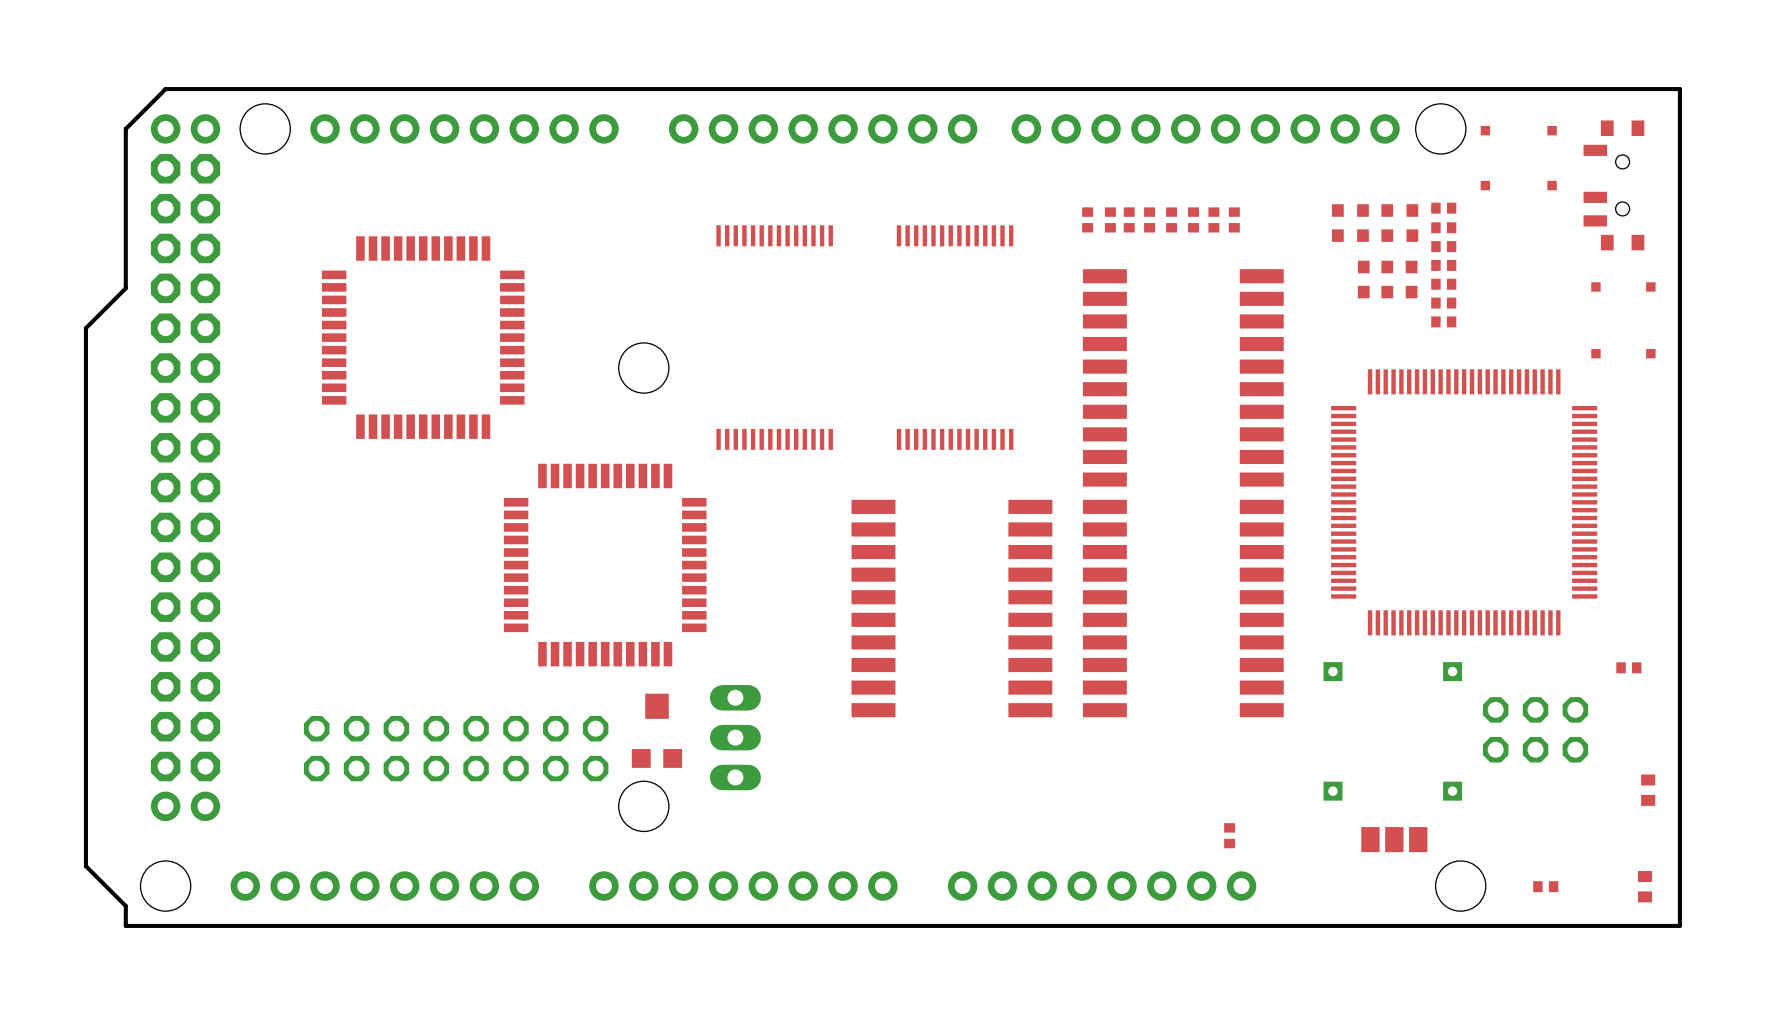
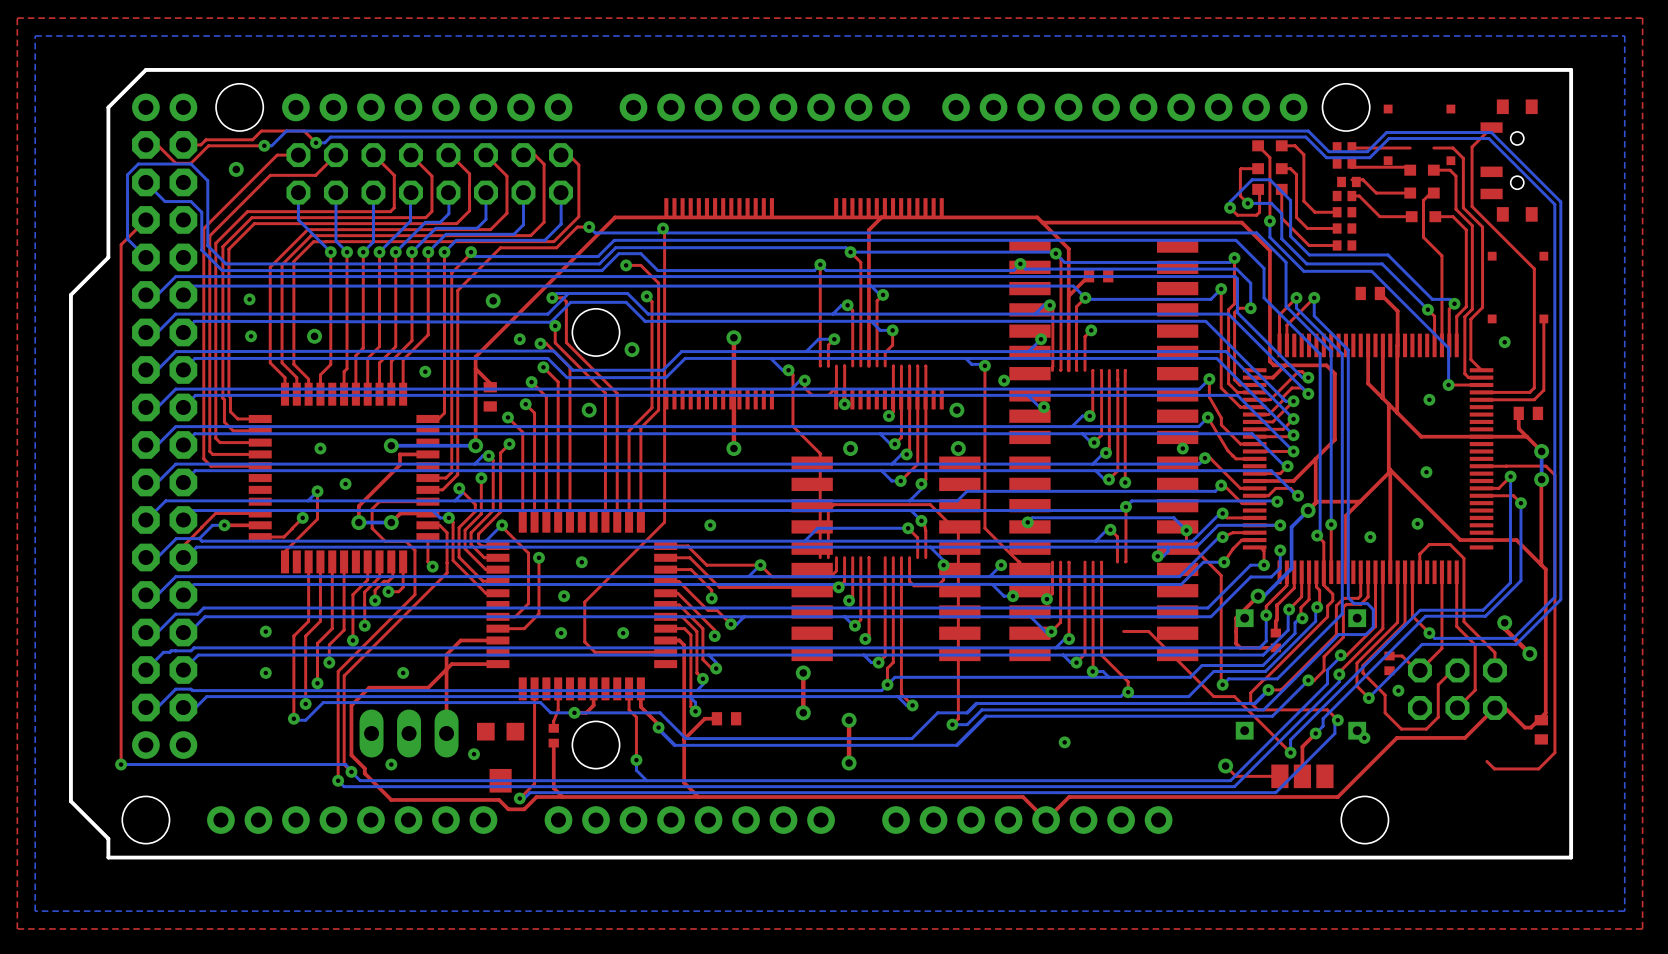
top zone outline: none -> (1642, 18) (1642, 928) (17, 928) (17, 18) (1642, 18)
bottom zone outline: none -> (1624, 35) (1624, 911) (35, 911) (35, 35) (1624, 35)
top track: none -> (1491, 127) (1472, 147) (1472, 206) (1534, 268) (1534, 387) (1529, 392) (1481, 392)
top track: none -> (316, 142) (304, 131) (261, 131) (252, 139) (206, 139) (200, 144) (183, 144)
bottom track: none -> (316, 142) (324, 142) (330, 137) (1305, 137) (1326, 157) (1369, 157) (1389, 138) (1488, 138) (1554, 204) (1554, 597) (1513, 638) (1434, 638) (1429, 633)
via: none -> (316, 142)
top track: none -> (145, 144) (157, 144) (175, 163) (191, 163) (208, 145) (264, 145)
bottom track: none -> (264, 145) (271, 145) (286, 131) (1308, 131) (1328, 151) (1367, 151) (1386, 132) (1491, 132) (1560, 201) (1560, 599) (1516, 644) (1422, 644) (1368, 698)
via: none -> (264, 145)
top track: none -> (1258, 145) (1269, 157) (1269, 221)
part: none -> (1269, 145)
top track: none -> (1281, 145) (1295, 145) (1303, 154) (1303, 201) (1314, 212) (1337, 212)
part: none -> (1344, 147)
top track: none -> (1351, 147) (1410, 148)
top track: none -> (1433, 148) (1453, 148) (1463, 158) (1463, 207) (1482, 227) (1482, 307) (1470, 319) (1470, 359) (1481, 370)
top track: none -> (298, 155) (277, 155) (203, 228) (203, 458) (211, 466) (260, 466)
top track: none -> (335, 155) (315, 175) (270, 175) (209, 235) (209, 451) (212, 454) (260, 454)
top track: none -> (373, 155) (394, 175) (394, 207) (390, 211) (247, 211) (215, 243) (215, 438) (220, 442) (260, 442)
top track: none -> (410, 155) (431, 176) (431, 211) (425, 217) (251, 217) (222, 246) (224, 422) (233, 430) (260, 430)
top track: none -> (448, 155) (450, 155) (469, 173) (469, 185)
top track: none -> (485, 155) (506, 176) (506, 213) (490, 229) (307, 229) (270, 267) (270, 362) (285, 377) (285, 394)
top track: none -> (523, 155) (535, 155) (544, 164) (544, 222) (530, 235) (311, 235) (282, 264) (282, 362) (296, 377) (296, 394)
top track: none -> (560, 155) (568, 155) (578, 165) (578, 216) (553, 241) (326, 241)
part: none -> (1344, 163)
top track: none -> (1351, 163) (1351, 167) (1407, 167) (1410, 170)
via: none -> (236, 169)
top track: none -> (1258, 168) (1240, 169) (1240, 196) (1247, 203)
part: none -> (1269, 168)
top track: none -> (1281, 168) (1290, 168) (1296, 174) (1296, 217) (1307, 228) (1337, 228)
part: none -> (1422, 170)
top track: none -> (1433, 170) (1450, 170) (1455, 176) (1455, 209) (1472, 225) (1472, 309) (1464, 316) (1464, 373) (1468, 377) (1481, 377)
part: none -> (429, 173)
top track: none -> (1351, 179) (1362, 179) (1376, 193) (1410, 193)
bottom track: none -> (145, 182) (165, 201) (191, 201) (201, 212) (201, 250) (222, 270) (601, 270) (618, 253) (640, 253) (657, 270) (814, 270) (820, 264) (826, 270) (1013, 270) (1020, 263) (1025, 269) (1236, 269) (1250, 283) (1250, 308)
top track: none -> (469, 185) (469, 199)
top track: none -> (1258, 189) (1259, 212) (1256, 215) (1237, 215) (1230, 207)
top track: none -> (1281, 189) (1281, 218) (1309, 245) (1337, 245)
bottom track: none -> (298, 192) (298, 219) (330, 252)
bottom track: none -> (335, 192) (335, 241) (347, 252)
bottom track: none -> (373, 192) (373, 241) (363, 252)
bottom track: none -> (410, 192) (410, 221) (379, 252)
bottom track: none -> (448, 192) (448, 213) (440, 222) (425, 222) (395, 252)
bottom track: none -> (485, 192) (485, 219) (477, 228) (435, 228) (412, 252)
bottom track: none -> (523, 192) (523, 224) (513, 234) (446, 234) (428, 252)
bottom track: none -> (561, 192) (561, 224) (544, 240) (456, 240) (444, 252)
part: (1087, 219) -> none
part: (1110, 219) -> none
part: (1129, 219) -> none
part: (1149, 219) -> none
part: (1171, 219) -> none
part: (1193, 219) -> none
part: (1213, 219) -> none
part: (1234, 219) -> none
part: none -> (1422, 193)
top track: none -> (1433, 193) (1430, 193) (1423, 200) (1423, 237) (1441, 255) (1441, 345)
part: (1337, 223) -> none
part rotation: 0° (1362, 223) -> 90° clockwise (1269, 189)
part: (1387, 223) -> none
part: (1412, 223) -> none
part: none -> (1344, 196)
top track: none -> (1351, 196) (1359, 196) (1379, 216) (1411, 216)
top track: none -> (469, 199) (469, 210) (456, 223) (254, 223) (228, 249) (230, 411) (237, 418) (260, 418)
part: (1443, 227) -> none
bottom track: none -> (1247, 203) (1271, 203) (1281, 213) (1281, 238) (1306, 263) (1382, 263) (1427, 309)
via: none -> (1247, 203)
bottom track: none -> (1230, 207) (1230, 201) (1252, 179) (1269, 179) (1290, 200) (1290, 236) (1309, 254) (1387, 254) (1432, 299) (1450, 299) (1454, 303)
via: none -> (1230, 207)
part: none -> (1344, 212)
top track: none -> (881, 217) (868, 230) (868, 365)
part: none -> (1423, 216)
top track: none -> (1435, 216) (1453, 216) (1466, 229) (1466, 306) (1456, 316) (1456, 345)
part: (1443, 246) -> none
top track: none -> (145, 219) (121, 244) (121, 764)
bottom track: none -> (1269, 221) (1269, 237) (1303, 271) (1371, 271) (1448, 348) (1448, 385)
via: none -> (1269, 221)
top track: none -> (1042, 222) (1241, 222) (1269, 250) (1269, 361) (1273, 365) (1326, 365) (1334, 373) (1334, 439) (1293, 481) (1254, 481)
top track: none -> (589, 227) (577, 227) (556, 247) (500, 247) (457, 290) (457, 474) (442, 489) (427, 489)
bottom track: none -> (589, 227) (595, 232) (658, 232) (663, 228) (667, 232) (1256, 232) (1286, 262) (1286, 306) (1331, 351) (1331, 524)
via: none -> (589, 227)
top track: none -> (663, 228) (664, 230) (664, 522) (584, 602) (584, 641) (595, 652) (665, 652)
via: none -> (663, 228)
part: none -> (1344, 228)
part: (1443, 265) -> none
top track: none -> (326, 241) (313, 241) (293, 261) (293, 364) (308, 379) (308, 394)
part: none -> (1344, 245)
part: (1363, 279) -> none
part: (1387, 279) -> none
part: (1411, 279) -> none
top track: none -> (330, 252) (330, 364) (320, 374) (320, 394)
via: none -> (330, 252)
top track: none -> (347, 252) (347, 368) (344, 371) (344, 394)
via: none -> (347, 252)
top track: none -> (363, 252) (363, 348) (355, 355) (355, 394)
via: none -> (363, 252)
top track: none -> (379, 252) (379, 346) (367, 358) (367, 394)
via: none -> (379, 252)
top track: none -> (395, 252) (395, 346) (379, 362) (379, 394)
via: none -> (395, 252)
top track: none -> (412, 252) (412, 340) (391, 361) (391, 394)
via: none -> (412, 252)
top track: none -> (428, 252) (428, 334) (403, 359) (403, 394)
via: none -> (428, 252)
top track: none -> (444, 252) (444, 413) (438, 418) (427, 418)
via: none -> (444, 252)
top track: none -> (471, 252) (451, 272)
bottom track: none -> (471, 252) (475, 256) (598, 256) (614, 240) (1235, 240) (1264, 268) (1264, 297) (1320, 354) (1320, 532) (1317, 535)
via: none -> (471, 252)
top track: none -> (850, 252) (860, 262) (860, 365)
via: none -> (850, 252)
top track: none -> (1055, 253) (1060, 258) (1060, 370)
via: none -> (1055, 253)
part: (1443, 284) -> none
bottom track: none -> (145, 257) (127, 239) (127, 174) (138, 164) (191, 164) (207, 180) (207, 245) (225, 263) (599, 263) (615, 247) (846, 247) (850, 252) (1054, 252) (1064, 262) (1230, 262) (1234, 258)
top track: none -> (1234, 258) (1234, 303) (1228, 309) (1228, 383) (1237, 392) (1254, 392)
via: none -> (1234, 258)
via: none -> (1020, 263)
top track: none -> (626, 265) (640, 265) (658, 283) (658, 410) (640, 427) (640, 521)
via: none -> (626, 265)
top track: none -> (820, 264) (820, 365)
via: none -> (820, 264)
part: (1443, 303) -> none
top track: none -> (451, 272) (451, 472) (445, 478) (427, 478)
top track: none -> (1089, 275) (1068, 296)
part: none -> (1098, 275)
bottom track: none -> (871, 286) (880, 294) (883, 294)
top track: none -> (1221, 289) (1221, 387) (1240, 407) (1254, 407)
bottom track: none -> (1221, 289) (1210, 299) (1086, 299) (1073, 286) (192, 286) (183, 294)
via: none -> (1221, 289)
part: (1443, 321) -> none
bottom track: none -> (568, 293) (547, 314) (175, 314) (157, 332) (145, 332)
part: none -> (1370, 293)
top track: none -> (1379, 293) (1397, 311) (1397, 412)
bottom track: none -> (145, 294) (157, 294) (175, 276) (1235, 276) (1237, 278) (1237, 312) (1302, 377) (1308, 377)
top track: none -> (883, 294) (877, 300) (877, 365)
via: none -> (883, 294)
top track: none -> (646, 296) (652, 301) (652, 407) (629, 430) (629, 521)
via: none -> (646, 296)
top track: none -> (552, 297) (562, 297) (566, 301) (566, 342) (617, 393) (617, 521)
bottom track: none -> (552, 297) (556, 293) (627, 293) (648, 314) (1228, 314) (1308, 393)
via: none -> (552, 297)
top track: none -> (1085, 297) (1076, 306) (1076, 370)
via: none -> (1085, 297)
top track: none -> (1296, 297) (1279, 314) (1279, 345)
bottom track: none -> (1296, 297) (1296, 308) (1342, 354) (1342, 613) (1277, 678) (1228, 678) (1222, 684)
via: none -> (1296, 297)
top track: none -> (1314, 297) (1286, 325) (1286, 345)
bottom track: none -> (1314, 297) (1314, 315) (1348, 350) (1348, 597) (1354, 603) (1367, 603) (1373, 609) (1373, 627) (1365, 634) (1338, 634) (1263, 709) (981, 709) (967, 724) (952, 724)
via: none -> (1314, 297)
via: none -> (249, 299)
via: none -> (493, 300)
part: (423, 337) -> none
top track: none -> (1454, 303) (1449, 309) (1449, 345)
via: none -> (1454, 303)
top track: none -> (847, 305) (852, 310) (852, 365)
bottom track: none -> (847, 305) (841, 305) (832, 314)
via: none -> (847, 305)
top track: none -> (1049, 305) (1052, 308) (1052, 370)
bottom track: none -> (1049, 305) (1046, 302) (1035, 314)
via: none -> (1049, 305)
top track: none -> (1250, 308) (1238, 308) (1234, 312) (1234, 379) (1239, 385) (1254, 385)
via: none -> (1250, 308)
top track: none -> (1427, 309) (1434, 316) (1434, 345)
via: none -> (1427, 309)
top track: none -> (1543, 318) (1543, 390) (1534, 399) (1481, 399)
bottom track: none -> (871, 321) (880, 330) (892, 330)
top track: none -> (555, 325) (555, 342) (605, 393) (605, 521)
via: none -> (555, 325)
top track: none -> (892, 330) (892, 345) (885, 352) (885, 365)
via: none -> (892, 330)
top track: none -> (1091, 330) (1084, 336) (1084, 370)
via: none -> (1091, 330)
bottom track: none -> (183, 332) (194, 321) (550, 322) (570, 302) (626, 302) (645, 321) (1205, 321) (1285, 401) (1293, 401)
via: none -> (251, 336)
via: none -> (314, 336)
top track: none -> (733, 337) (733, 448)
via: none -> (733, 337)
via: none -> (519, 339)
top track: none -> (834, 339) (828, 345) (828, 366)
bottom track: none -> (834, 339) (818, 339) (806, 351)
via: none -> (834, 339)
bottom track: none -> (1041, 339) (1028, 351)
via: none -> (1041, 339)
via: none -> (1504, 342)
top track: none -> (540, 343) (546, 343) (570, 367) (570, 521)
via: none -> (540, 343)
top track: none -> (1368, 345) (1368, 383) (1421, 436) (1526, 436)
top track: none -> (1382, 345) (1382, 397)
via: none -> (632, 349)
bottom track: none -> (770, 358) (782, 370) (788, 370)
bottom track: none -> (965, 358) (971, 364) (984, 365)
top track: none -> (1285, 365) (1272, 377) (1254, 377)
top track: none -> (836, 365) (836, 387) (828, 395) (812, 395) (804, 387) (804, 380)
top track: none -> (844, 365) (844, 404)
top track: none -> (893, 366) (893, 411) (888, 416)
top track: none -> (901, 365) (901, 437) (894, 444)
top track: none -> (909, 366) (909, 451) (906, 454)
top track: none -> (917, 366) (917, 464) (900, 481)
top track: none -> (925, 366) (925, 479) (921, 483)
top track: none -> (984, 365) (984, 528) (1020, 562)
via: none -> (984, 365)
top track: none -> (543, 367) (558, 382) (558, 521)
via: none -> (543, 367)
top track: none -> (475, 368) (490, 383) (490, 387)
bottom track: none -> (145, 369) (157, 369) (175, 351) (553, 351) (572, 370) (663, 370) (681, 351) (1226, 351) (1293, 418)
bottom track: none -> (183, 369) (194, 358) (547, 358) (567, 377) (665, 377) (685, 358) (1216, 358) (1293, 435)
top track: none -> (788, 370) (792, 374) (792, 426) (820, 453) (820, 557)
via: none -> (788, 370)
top track: none -> (1068, 370) (1068, 248) (1037, 217) (615, 217) (475, 356) (475, 445)
top track: none -> (1093, 370) (1092, 413) (1089, 416)
top track: none -> (1101, 370) (1101, 435) (1094, 442)
top track: none -> (1109, 370) (1109, 449) (1106, 452)
top track: none -> (1117, 370) (1117, 379)
top track: none -> (1125, 370) (1125, 482)
via: none -> (425, 371)
top track: none -> (1308, 377) (1302, 371) (1298, 371) (1270, 399) (1254, 399)
via: none -> (1308, 377)
top track: none -> (1117, 379) (1117, 470) (1108, 479)
top track: none -> (1209, 379) (1209, 397) (1221, 418) (1221, 424) (1240, 444) (1254, 444)
bottom track: none -> (1209, 379) (1199, 389) (175, 389) (157, 407) (145, 407)
via: none -> (1209, 379)
bottom track: none -> (804, 380) (799, 380) (791, 389)
via: none -> (804, 380)
via: none -> (1004, 380)
top track: none -> (531, 382) (546, 396) (546, 521)
via: none -> (531, 382)
via: none -> (1448, 385)
top track: none -> (1481, 385) (1448, 385)
top track: none -> (1308, 393) (1302, 387) (1292, 387) (1268, 414) (1254, 414)
via: none -> (1308, 393)
bottom track: none -> (1027, 395) (1039, 407) (1044, 407)
part: none -> (490, 396)
via: none -> (1429, 399)
top track: none -> (1293, 401) (1272, 421) (1254, 421)
via: none -> (1293, 401)
top track: none -> (525, 404) (534, 413) (534, 521)
via: none -> (525, 404)
via: none -> (844, 404)
top track: none -> (1388, 404) (1388, 472) (1345, 515) (1345, 572)
bottom track: none -> (183, 407) (195, 395) (1237, 395) (1293, 451)
via: none -> (1044, 407)
via: none -> (589, 410)
via: none -> (956, 410)
top track: none -> (1518, 413) (1518, 428) (1541, 451)
part: none -> (1528, 413)
via: none -> (888, 416)
bottom track: none -> (1089, 416) (1082, 416) (1072, 426)
via: none -> (1089, 416)
top track: none -> (507, 417) (522, 432) (522, 521)
via: none -> (507, 417)
top track: none -> (1207, 417) (1227, 450) (1236, 458) (1254, 458)
bottom track: none -> (1207, 417) (1198, 426) (175, 426) (157, 444) (145, 444)
via: none -> (1207, 417)
top track: none -> (1293, 418) (1283, 429) (1254, 429)
via: none -> (1293, 418)
bottom track: none -> (880, 433) (890, 444) (894, 444)
bottom track: none -> (1082, 433) (1091, 442) (1094, 442)
top track: none -> (1293, 435) (1254, 436)
via: none -> (1293, 435)
via: none -> (1094, 442)
top track: none -> (509, 444) (500, 452) (500, 511) (478, 534) (478, 543) (481, 545) (497, 545)
via: none -> (509, 444)
via: none -> (894, 444)
bottom track: none -> (183, 444) (194, 433) (1252, 433) (1286, 467) (1287, 466)
via: none -> (391, 445)
bottom track: none -> (475, 445) (391, 445)
via: none -> (475, 445)
via: none -> (320, 448)
via: none -> (733, 448)
via: none -> (850, 448)
via: none -> (958, 448)
via: none -> (1182, 448)
top track: none -> (1293, 451) (1254, 451)
via: none -> (1293, 451)
bottom track: none -> (1541, 451) (1541, 479)
via: none -> (1541, 451)
bottom track: none -> (1106, 452) (1092, 464)
via: none -> (1106, 452)
top track: none -> (427, 454) (400, 454) (400, 464) (358, 506) (358, 522)
bottom track: none -> (906, 454) (901, 454) (891, 464)
via: none -> (906, 454)
top track: none -> (488, 455) (493, 460) (493, 510) (471, 532) (471, 544) (484, 557) (497, 557)
bottom track: none -> (488, 455) (482, 455) (474, 464)
via: none -> (488, 455)
top track: none -> (1204, 458) (1210, 458) (1240, 488) (1254, 488)
bottom track: none -> (1204, 458) (1198, 464) (175, 464) (157, 482) (145, 482)
via: none -> (1204, 458)
top track: none -> (1315, 458) (1315, 502)
top track: none -> (1287, 466) (1280, 473) (1254, 473)
via: none -> (1287, 466)
top track: none -> (1506, 466) (1545, 466) (1554, 475) (1554, 752) (1538, 768) (1494, 768) (1486, 761)
top track: none -> (1506, 466) (1481, 466)
top track: none -> (1388, 468) (1460, 540) (1516, 540) (1545, 569) (1545, 712) (1531, 727) (1524, 727) (1505, 707) (1494, 707) (1464, 737) (1396, 737) (1337, 797) (1069, 797) (1046, 820) (1023, 797) (536, 797) (524, 809) (508, 809) (499, 799) (391, 799) (364, 773) (364, 768) (351, 755) (351, 705) (369, 687) (428, 687) (451, 664) (497, 664)
bottom track: none -> (881, 470) (891, 481) (900, 481)
bottom track: none -> (1095, 470) (1104, 479) (1108, 479)
top track: none -> (1390, 469) (1390, 572)
via: none -> (1426, 472)
top track: none -> (1510, 476) (1498, 488) (1481, 488)
bottom track: none -> (1510, 476) (1510, 498)
via: none -> (1510, 476)
part: none -> (344, 478)
top track: none -> (481, 478) (481, 513) (465, 530) (465, 548) (485, 569) (497, 569)
via: none -> (481, 478)
via: none -> (1108, 479)
top track: none -> (1541, 479) (1541, 564)
via: none -> (1541, 479)
via: none -> (900, 481)
bottom track: none -> (183, 482) (195, 470) (1271, 470) (1297, 495)
via: none -> (1125, 482)
via: none -> (345, 483)
bottom track: none -> (921, 483) (921, 489) (909, 500)
via: none -> (921, 483)
top track: none -> (1221, 485) (1224, 485) (1241, 503) (1254, 503)
bottom track: none -> (1221, 485) (1215, 491) (966, 491) (957, 500) (165, 500) (145, 519)
via: none -> (1221, 485)
top track: none -> (459, 488) (475, 504) (475, 511) (459, 527) (459, 557) (482, 581) (497, 581)
bottom track: none -> (459, 488) (462, 493) (454, 500)
via: none -> (459, 488)
top track: none -> (317, 491) (317, 519) (285, 551) (285, 561)
bottom track: none -> (317, 491) (307, 500)
via: none -> (317, 491)
top track: none -> (1297, 495) (1290, 488) (1275, 488) (1268, 495) (1254, 495)
via: none -> (1297, 495)
top track: none -> (1481, 495) (1513, 495) (1520, 503)
bottom track: none -> (1510, 498) (1510, 582) (1483, 610) (1420, 610) (1290, 739) (1290, 752)
top track: none -> (427, 501) (379, 501) (372, 509) (372, 528) (385, 541) (406, 541) (414, 550) (414, 594) (338, 671) (338, 780)
bottom track: none -> (1277, 501) (1131, 500) (1122, 510) (192, 510) (183, 519)
via: none -> (1277, 501)
top track: none -> (1360, 501) (1316, 501) (1308, 510)
bottom track: none -> (1520, 503) (1520, 580) (1485, 616) (1425, 616) (1323, 718) (1323, 726) (1315, 733)
via: none -> (1520, 503)
top track: none -> (1125, 506) (1125, 562)
via: none -> (1125, 506)
bottom track: none -> (432, 510) (440, 517) (448, 517)
bottom track: none -> (911, 510) (921, 520)
bottom track: none -> (1308, 510) (1291, 527) (1291, 568) (1264, 596) (1258, 596)
via: none -> (1308, 510)
top track: none -> (260, 513) (215, 513) (183, 545) (183, 557)
top track: none -> (427, 513) (400, 513) (391, 522)
top track: none -> (1222, 513) (1227, 517) (1254, 517)
bottom track: none -> (1222, 513) (1220, 513) (1192, 541) (201, 541) (199, 538)
via: none -> (1222, 513)
top track: none -> (302, 517) (284, 537) (266, 537)
via: none -> (302, 517)
top track: none -> (448, 517) (453, 522) (453, 560) (485, 593) (497, 593)
via: none -> (448, 517)
part position: (605, 565) -> (581, 605)
top track: none -> (921, 520) (925, 530) (925, 557)
via: none -> (921, 520)
via: none -> (358, 522)
bottom track: none -> (391, 522) (358, 522)
via: none -> (391, 522)
bottom track: none -> (1027, 522) (1032, 517) (1173, 517) (1186, 530)
via: none -> (1027, 522)
via: none -> (1417, 523)
bottom track: none -> (224, 525) (212, 525) (199, 538)
via: none -> (224, 525)
top track: none -> (260, 525) (224, 525)
top track: none -> (427, 525) (439, 525) (447, 532) (447, 562)
top track: none -> (502, 525) (528, 553) (528, 603) (515, 616) (497, 616)
bottom track: none -> (502, 525) (485, 541)
via: none -> (502, 525)
via: none -> (710, 525)
bottom track: none -> (1280, 525) (1218, 525) (1196, 547) (196, 547) (186, 557) (183, 557)
via: none -> (1280, 525)
top track: none -> (1331, 524) (1331, 572)
via: none -> (1331, 524)
top track: none -> (908, 528) (917, 537) (917, 557)
bottom track: none -> (908, 528) (817, 528) (804, 541)
via: none -> (908, 528)
top track: none -> (1110, 529) (1117, 536) (1117, 562)
bottom track: none -> (1110, 529) (1107, 529) (1095, 541)
via: none -> (1110, 529)
top track: none -> (1186, 530) (1186, 540) (1221, 575) (1222, 684)
via: none -> (1186, 530)
top track: none -> (1254, 532) (1233, 532) (1222, 537)
top track: none -> (1317, 535) (1323, 542) (1323, 585) (1332, 594) (1332, 600) (1327, 606) (1327, 616) (1250, 692) (1250, 702) (1257, 709) (1327, 709) (1337, 720)
via: none -> (1317, 535)
top track: none -> (427, 537) (427, 561) (432, 566)
bottom track: none -> (1222, 537) (1219, 537) (1179, 576) (175, 576) (157, 595) (145, 595)
via: none -> (1222, 537)
via: none -> (1370, 537)
bottom track: none -> (199, 538) (176, 538) (157, 557) (145, 557)
top track: none -> (1254, 540) (1241, 540) (1224, 562)
top track: none -> (665, 545) (688, 545) (706, 565) (760, 565) (772, 576) (830, 576) (836, 570) (836, 557)
bottom track: none -> (930, 547) (943, 560) (943, 565)
bottom track: none -> (1168, 547) (1168, 551) (1163, 556) (1157, 556)
top track: none -> (1254, 547) (1260, 547) (1264, 550) (1264, 565)
bottom track: none -> (1280, 550) (1280, 568) (1271, 576) (1250, 576) (1210, 616) (205, 616) (189, 632) (183, 632)
via: none -> (1280, 550)
via: none -> (1157, 556)
top track: none -> (538, 557) (538, 613) (524, 628) (497, 628)
via: none -> (538, 557)
top track: none -> (828, 557) (828, 510) (834, 504) (930, 504) (958, 532) (958, 718) (952, 724)
top track: none -> (844, 557) (844, 581) (838, 587) (719, 587) (689, 557) (665, 557)
top track: none -> (852, 557) (852, 597) (849, 600)
top track: none -> (860, 557) (860, 619) (854, 625)
top track: none -> (869, 557) (869, 635) (865, 639)
top track: none -> (885, 557) (885, 656) (878, 662)
top track: none -> (893, 557) (893, 662) (887, 668) (887, 684)
top track: none -> (901, 557) (901, 694) (912, 705)
top track: none -> (909, 557) (909, 581) (914, 585) (937, 585) (943, 579) (943, 565)
top track: none -> (308, 561) (308, 621) (293, 636) (293, 718)
top track: none -> (320, 561) (320, 621) (305, 636) (305, 703)
top track: none -> (332, 561) (332, 628) (317, 643) (317, 683)
top track: none -> (344, 561) (344, 630) (329, 644) (329, 662)
top track: none -> (367, 561) (367, 579) (352, 594) (352, 640)
top track: none -> (379, 562) (379, 577) (364, 592) (364, 604)
top track: none -> (391, 561) (392, 576) (388, 581) (384, 581) (375, 590) (375, 600)
top track: none -> (403, 561) (403, 587) (398, 591) (388, 591)
top track: none -> (1052, 562) (1052, 593) (1046, 599)
top track: none -> (1060, 562) (1060, 622) (1051, 631)
top track: none -> (1068, 562) (1069, 639)
top track: none -> (1084, 562) (1084, 654) (1076, 662)
top track: none -> (1093, 562) (1092, 671)
top track: none -> (1101, 562) (1101, 655) (1128, 681) (1128, 692)
top track: none -> (447, 562) (447, 572) (344, 675) (344, 764) (351, 771)
via: none -> (581, 562)
bottom track: none -> (1224, 562) (1203, 562) (1181, 584) (992, 584)
via: none -> (1224, 562)
bottom track: none -> (760, 565) (748, 576)
via: none -> (760, 565)
via: none -> (943, 565)
bottom track: none -> (1001, 565) (989, 576)
via: none -> (1001, 565)
bottom track: none -> (1264, 565) (1250, 565) (1207, 607) (203, 607) (197, 614) (175, 614) (157, 632) (145, 632)
via: none -> (1264, 565)
via: none -> (432, 566)
top track: none -> (665, 569) (691, 569) (711, 590) (711, 598)
top track: none -> (1286, 572) (1286, 585) (1266, 606) (1266, 615)
top track: none -> (1294, 572) (1294, 588) (1277, 605) (1275, 633)
top track: none -> (1301, 572) (1301, 596) (1289, 609)
top track: none -> (1309, 572) (1309, 599) (1300, 607) (1302, 618)
top track: none -> (1316, 572) (1316, 587) (1319, 590) (1319, 604) (1317, 607)
top track: none -> (1360, 572) (1360, 595) (1358, 598) (1343, 598) (1336, 605) (1336, 634) (1281, 689) (1268, 689)
top track: none -> (1368, 572) (1368, 596) (1360, 604) (1346, 604) (1343, 607) (1343, 637) (1324, 656) (1324, 670) (1314, 680) (1308, 680)
top track: none -> (1375, 572) (1375, 626) (1346, 655) (1340, 655)
top track: none -> (1382, 572) (1382, 628) (1339, 672) (1339, 674)
top track: none -> (1397, 572) (1397, 622) (1356, 663) (1356, 686) (1368, 698)
top track: none -> (1405, 572) (1405, 623) (1362, 665) (1362, 672) (1385, 695) (1385, 712) (1401, 729) (1426, 729) (1438, 717) (1438, 684) (1452, 670) (1457, 670)
top track: none -> (1412, 572) (1412, 616) (1429, 633)
top track: none -> (1419, 572) (1419, 554) (1429, 544) (1450, 544) (1463, 558) (1463, 621) (1494, 652) (1494, 670)
top track: none -> (1441, 572) (1441, 648) (1418, 672) (1402, 655) (1389, 655)
top track: none -> (1456, 572) (1456, 626) (1475, 644) (1475, 690) (1457, 707)
top track: none -> (665, 581) (678, 581) (707, 610) (717, 610) (730, 624)
via: none -> (838, 587)
via: none -> (388, 591)
top track: none -> (665, 593) (677, 593) (714, 630) (714, 636)
bottom track: none -> (183, 595) (193, 584) (835, 584) (838, 587) (841, 584) (992, 584) (1004, 596) (1012, 596)
via: none -> (564, 596)
via: none -> (1012, 596)
top track: none -> (1258, 596) (1236, 618) (1236, 643) (1240, 647) (1275, 647)
via: none -> (1258, 596)
via: none -> (711, 598)
via: none -> (1046, 599)
via: none -> (375, 600)
via: none -> (849, 600)
top track: none -> (364, 605) (364, 625)
top track: none -> (665, 605) (679, 605) (702, 628) (702, 659) (711, 668) (716, 668)
bottom track: none -> (1317, 607) (1315, 621) (1265, 671) (1213, 671) (1188, 696) (1132, 696) (1128, 692) (1125, 692) (1120, 696) (206, 696) (195, 707) (183, 707)
via: none -> (1317, 607)
bottom track: none -> (1289, 609) (1288, 630) (1263, 655) (198, 655) (183, 670)
via: none -> (1289, 609)
part: (1628, 667) -> none
bottom track: none -> (1266, 615) (1266, 641) (1259, 647) (194, 647) (191, 650) (163, 652) (145, 670)
via: none -> (1266, 615)
top track: none -> (665, 616) (682, 616) (696, 631) (696, 672) (702, 678)
bottom track: none -> (744, 616) (736, 624) (730, 624)
bottom track: none -> (844, 616) (854, 625)
bottom track: none -> (1030, 616) (1045, 631) (1051, 631)
bottom track: none -> (1302, 618) (1299, 618) (1295, 622) (1295, 633) (1263, 665) (1202, 665) (1190, 677) (894, 677) (881, 690) (175, 689) (157, 707) (145, 707)
via: none -> (1302, 618)
top track: none -> (1504, 622) (1504, 628) (1529, 653)
via: none -> (1504, 622)
via: none -> (730, 624)
via: none -> (364, 625)
via: none -> (854, 625)
top track: none -> (665, 628) (684, 628) (690, 635) (690, 706) (695, 711)
via: none -> (265, 631)
via: none -> (1051, 631)
top track: none -> (1123, 631) (1148, 631) (1213, 696) (1234, 696) (1290, 752)
via: none -> (561, 633)
via: none -> (623, 633)
via: none -> (1429, 633)
via: none -> (714, 636)
via: none -> (865, 639)
bottom track: none -> (1069, 639) (1064, 639) (1055, 647)
via: none -> (1069, 639)
via: none -> (352, 640)
top track: none -> (497, 640) (460, 640) (446, 654) (446, 733)
top track: none -> (665, 640) (679, 640) (684, 645) (684, 782) (698, 797)
part: none -> (1275, 640)
via: none -> (1529, 653)
bottom track: none -> (708, 655) (716, 662) (716, 668)
bottom track: none -> (863, 655) (871, 662) (878, 662)
bottom track: none -> (1063, 655) (1070, 662) (1076, 662)
bottom track: none -> (1340, 655) (1327, 670) (1327, 683) (1230, 780) (360, 780) (345, 764) (121, 764)
via: none -> (1340, 655)
via: none -> (329, 662)
via: none -> (878, 662)
via: none -> (1076, 662)
part: none -> (1389, 663)
via: none -> (716, 668)
bottom track: none -> (1092, 671) (1103, 671) (1108, 677)
via: none -> (1092, 671)
via: none -> (265, 672)
via: none -> (403, 672)
top track: none -> (803, 672) (803, 712)
via: none -> (803, 672)
part position: (1535, 729) -> (1457, 689)
part rotation: 0° (656, 730) -> 180° (500, 757)
part position: (656, 730) -> (500, 757)
bottom track: none -> (1339, 674) (1339, 681) (1234, 786) (344, 786) (338, 780)
via: none -> (1339, 674)
bottom track: none -> (702, 678) (702, 684) (696, 690)
via: none -> (702, 678)
part rotation: 0° (735, 737) -> 90° clockwise (409, 733)
part position: (735, 737) -> (409, 733)
bottom track: none -> (1308, 680) (1272, 716) (985, 716) (956, 745) (674, 745) (658, 727)
via: none -> (1308, 680)
via: none -> (317, 683)
via: none -> (887, 684)
via: none -> (1222, 684)
top track: none -> (534, 688) (534, 783) (519, 798)
top track: none -> (558, 688) (558, 710) (553, 721) (553, 728)
top track: none -> (593, 688) (593, 705) (586, 712) (574, 712)
top track: none -> (629, 688) (629, 709) (636, 717) (636, 760)
top track: none -> (640, 688) (640, 706) (658, 724) (658, 727)
bottom track: none -> (1268, 689) (1254, 703) (976, 703) (967, 712) (937, 712) (911, 738) (685, 738) (660, 712) (550, 712) (540, 702) (323, 702) (305, 720) (293, 718)
via: none -> (1268, 689)
part: (456, 748) -> none
via: none -> (1398, 690)
via: none -> (1128, 692)
bottom track: none -> (689, 696) (695, 702) (695, 711)
bottom track: none -> (897, 696) (906, 705) (912, 705)
via: none -> (1368, 698)
via: none -> (305, 703)
via: none -> (912, 705)
via: none -> (695, 711)
via: none -> (574, 712)
via: none -> (803, 712)
via: none -> (293, 718)
top track: none -> (716, 718) (704, 718) (684, 739)
part: none -> (726, 718)
top track: none -> (849, 720) (849, 763)
via: none -> (849, 720)
bottom track: none -> (1337, 720) (1334, 723) (1334, 733) (1275, 792) (530, 792) (524, 798) (519, 798)
via: none -> (1337, 720)
via: none -> (952, 724)
via: none -> (658, 727)
top track: none -> (1315, 733) (1302, 746) (1302, 776)
via: none -> (1315, 733)
part: none -> (553, 735)
via: none -> (1364, 737)
via: none -> (1064, 742)
top track: none -> (553, 743) (553, 788) (562, 797)
via: none -> (1290, 752)
via: none -> (474, 754)
bottom track: none -> (636, 760) (636, 770) (646, 780)
via: none -> (636, 760)
via: none -> (849, 763)
via: none -> (121, 764)
via: none -> (391, 764)
top track: none -> (1225, 765) (1235, 776) (1279, 776)
via: none -> (1225, 765)
via: none -> (351, 771)
part: (1229, 835) -> none
via: none -> (338, 780)
via: none -> (519, 798)
part: (1545, 886) -> none
part: (1645, 886) -> none

